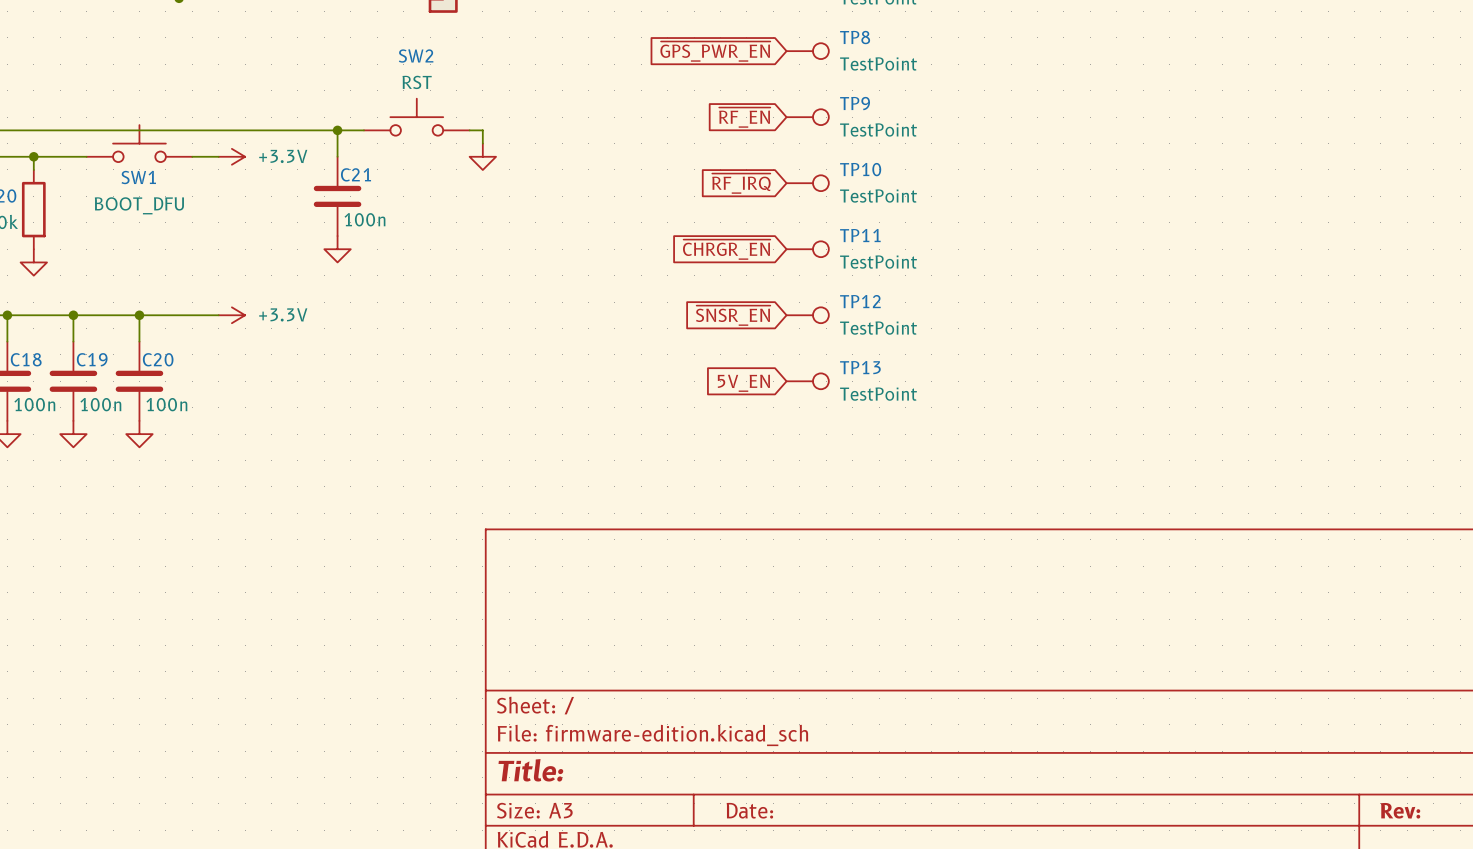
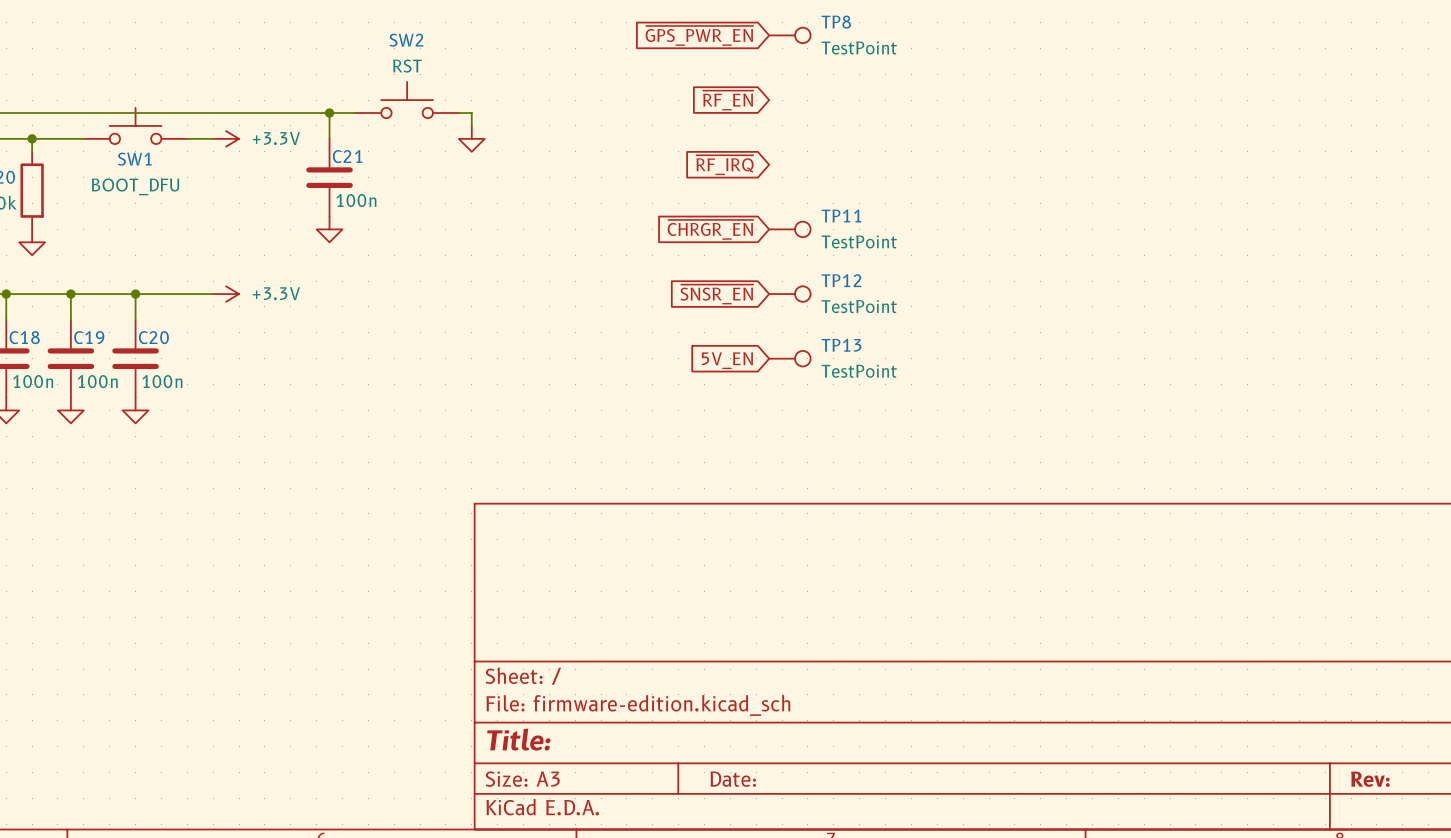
TP9: TestPoint (807, 117) -> none
TP10: TestPoint (807, 183) -> none

